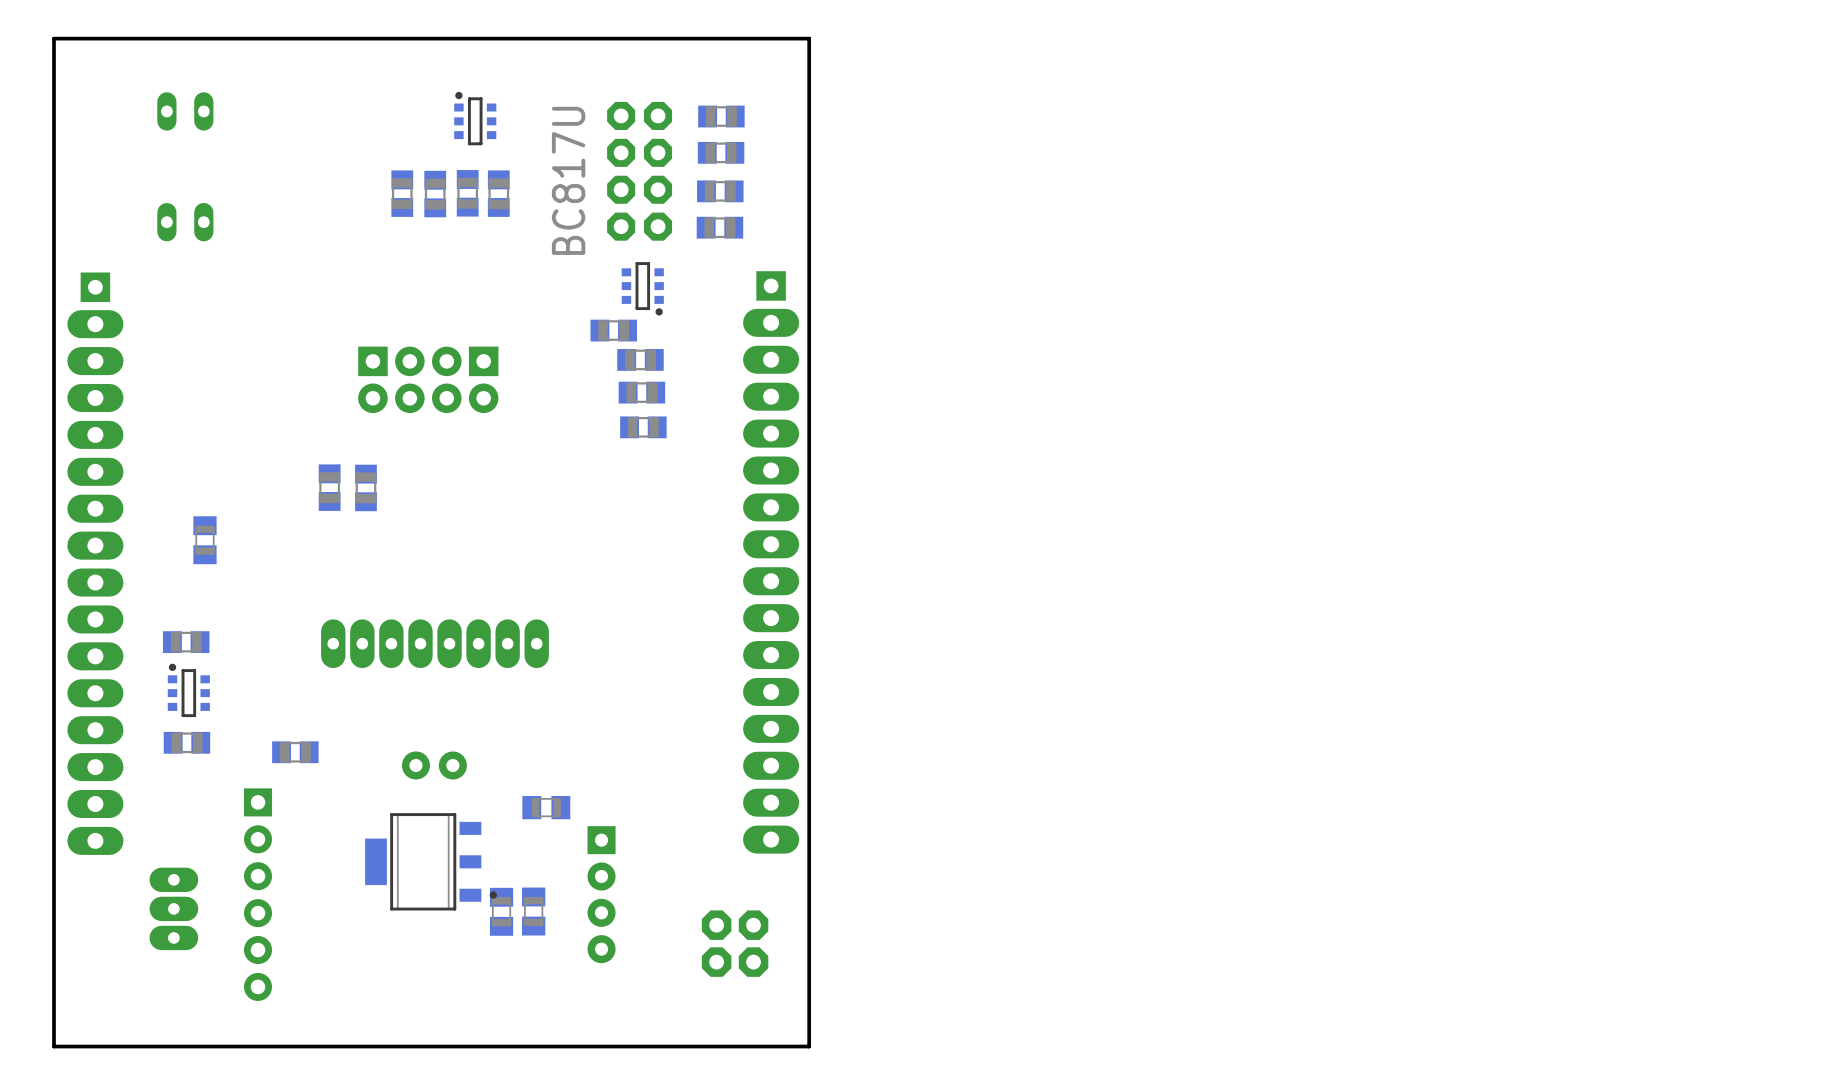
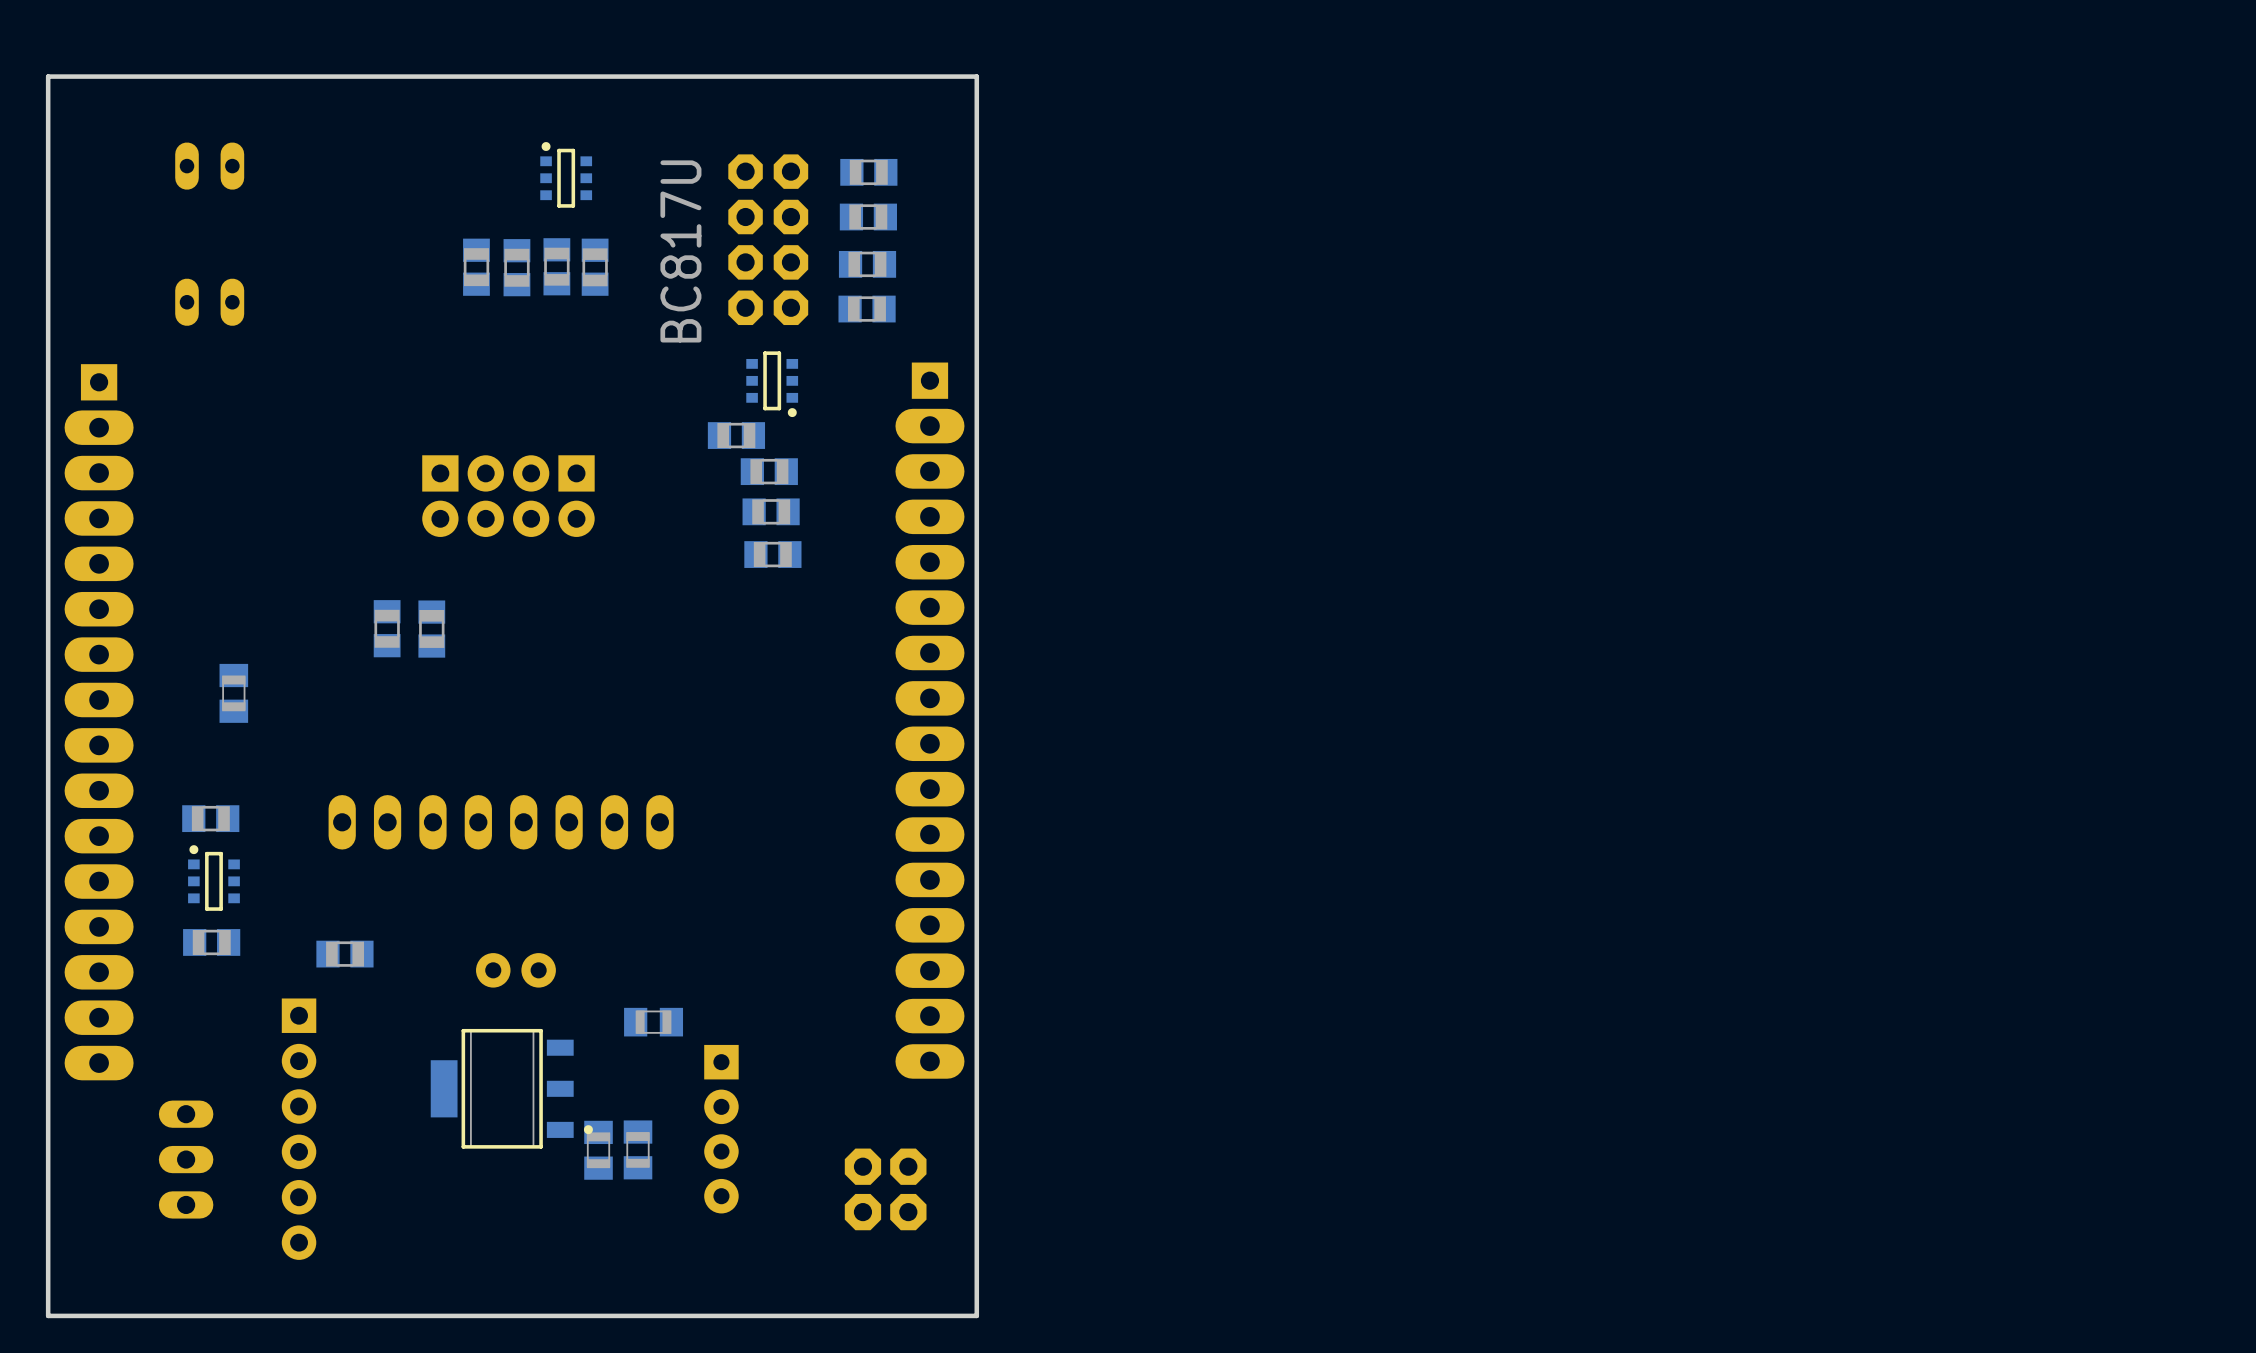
part footprint: [321, 619, 549, 669] -> [328, 795, 674, 850]
part footprint: [149, 867, 199, 951] -> [158, 1100, 214, 1219]

